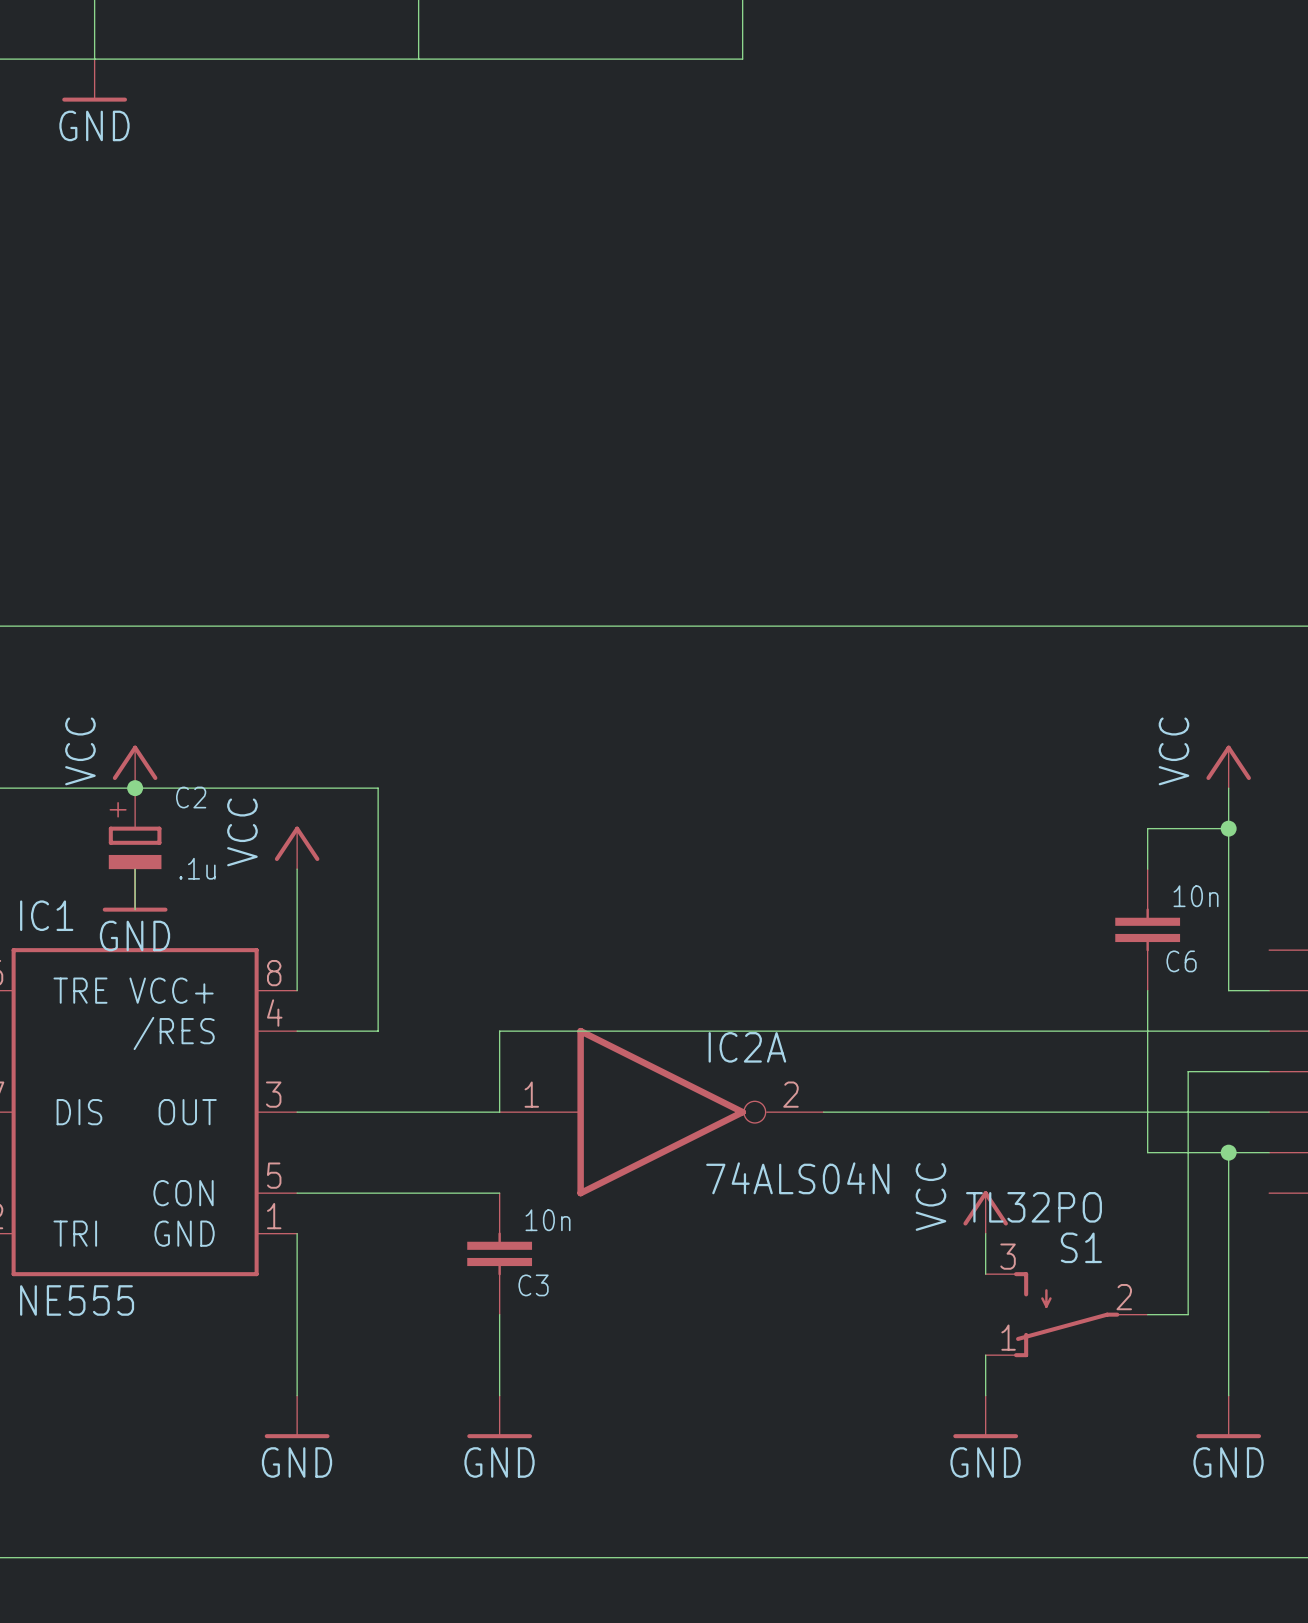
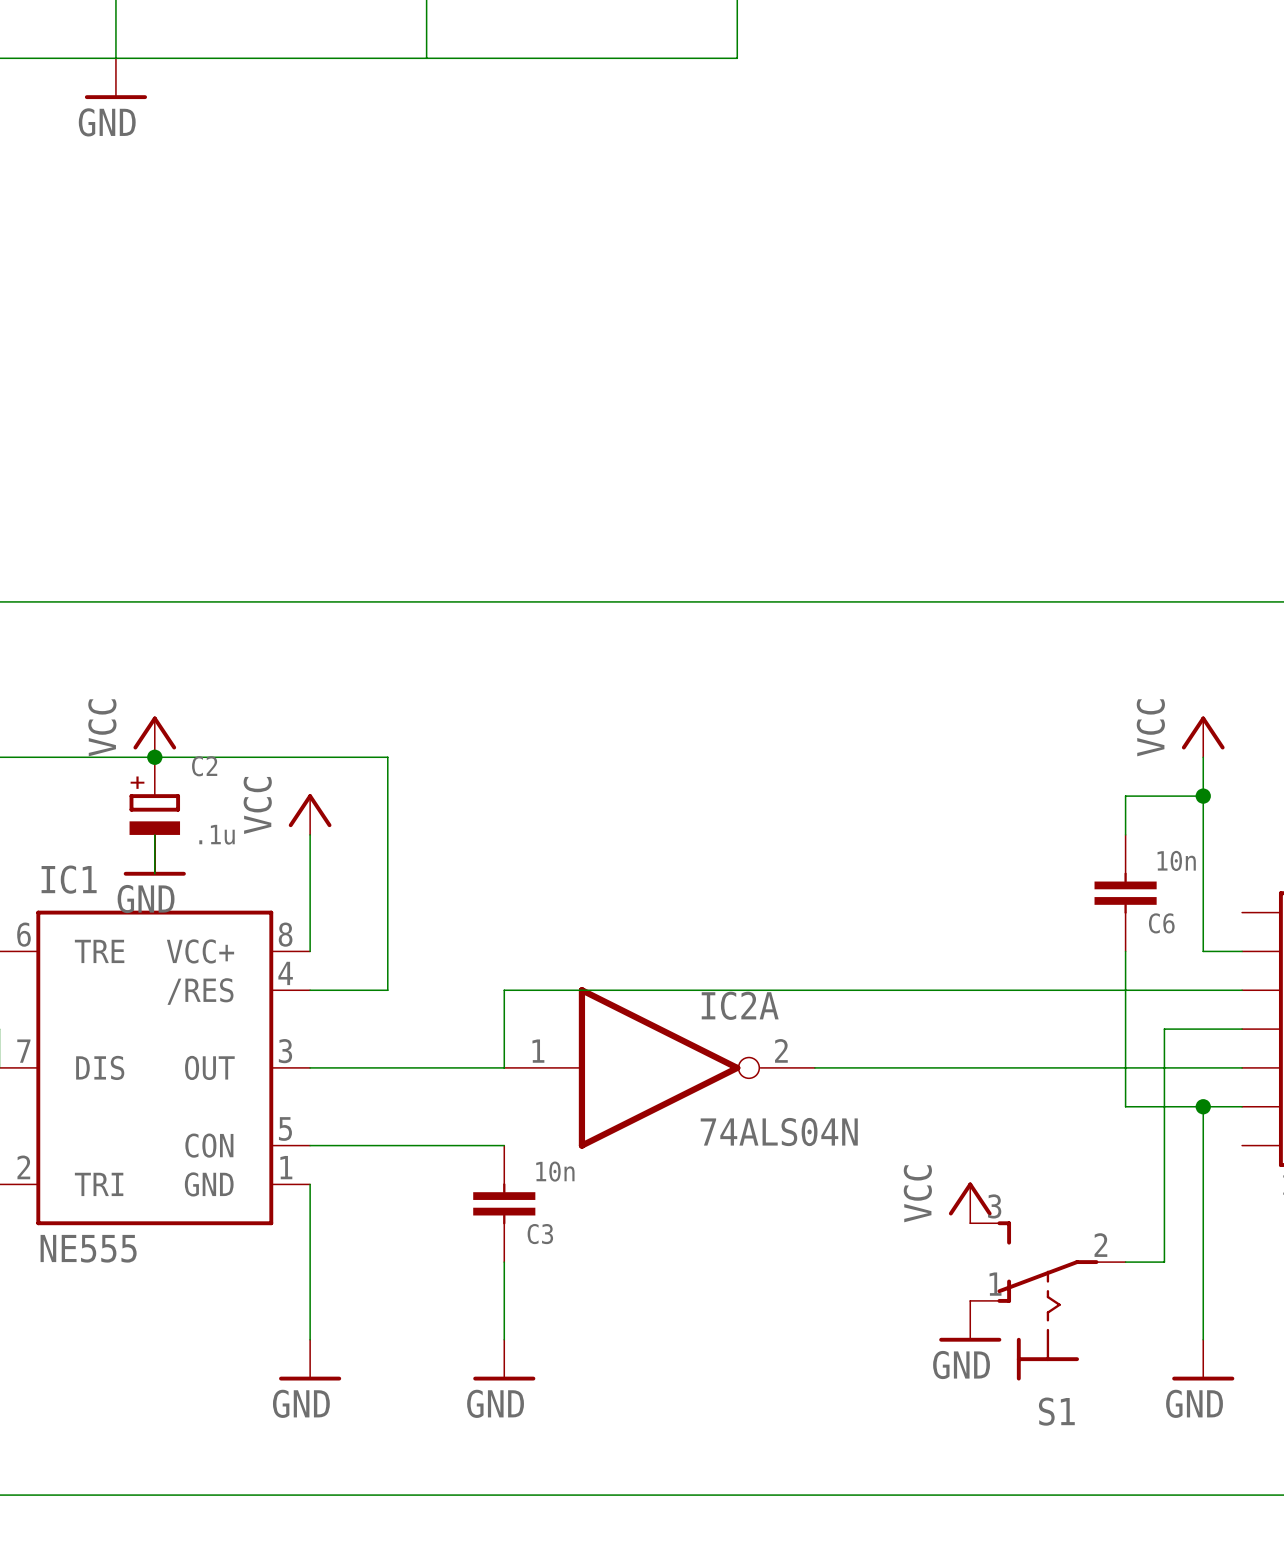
S1 value: TL32PO (1033, 1207) -> none
power symbol position: VCC (985, 1212) -> VCC (970, 1202)
S1 name position: S1 (1081, 1247) -> S1 (1056, 1411)
S1 symbol: [985, 1272, 1148, 1358] -> [970, 1221, 1126, 1381]
power symbol position: GND (985, 1416) -> GND (970, 1321)

